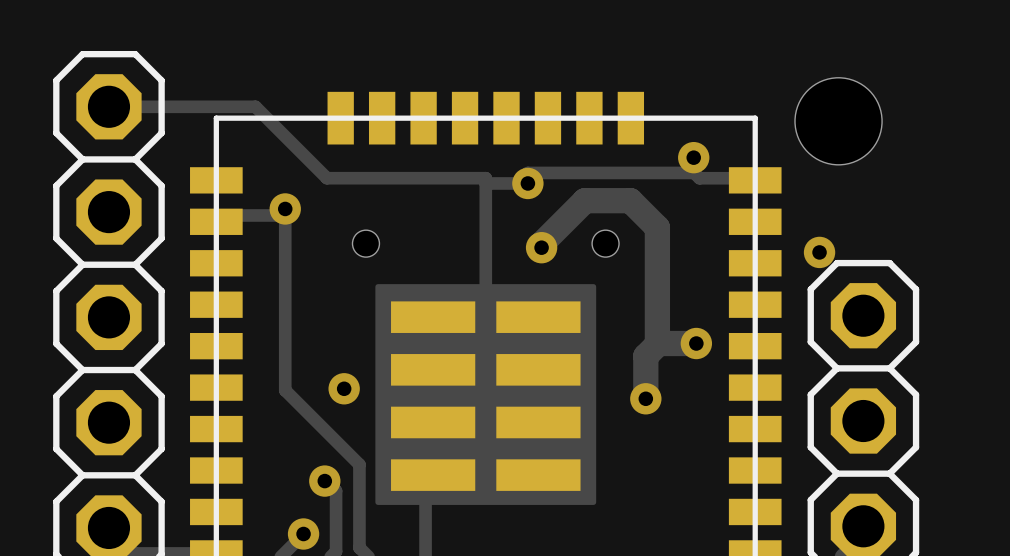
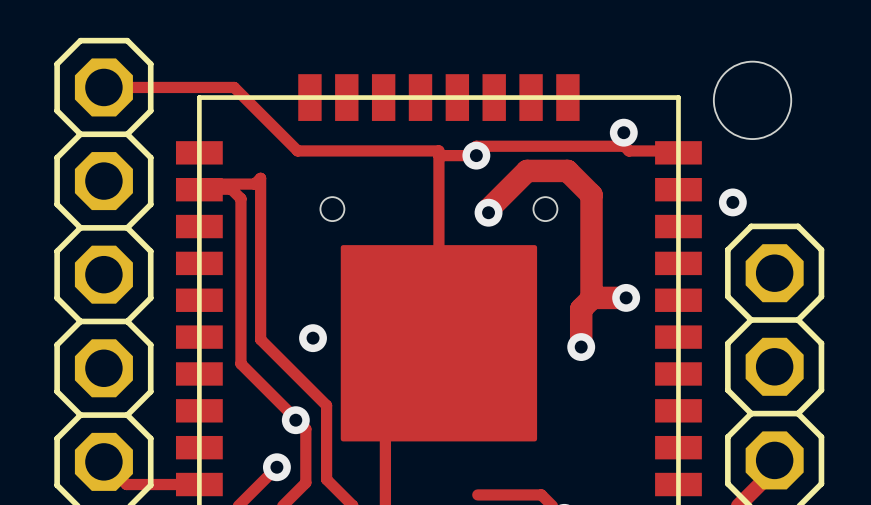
via: (285, 208) -> none
track: none -> (212, 189) (231, 189) (240, 198) (240, 363) (290, 413)
via position: (819, 252) -> (732, 202)

